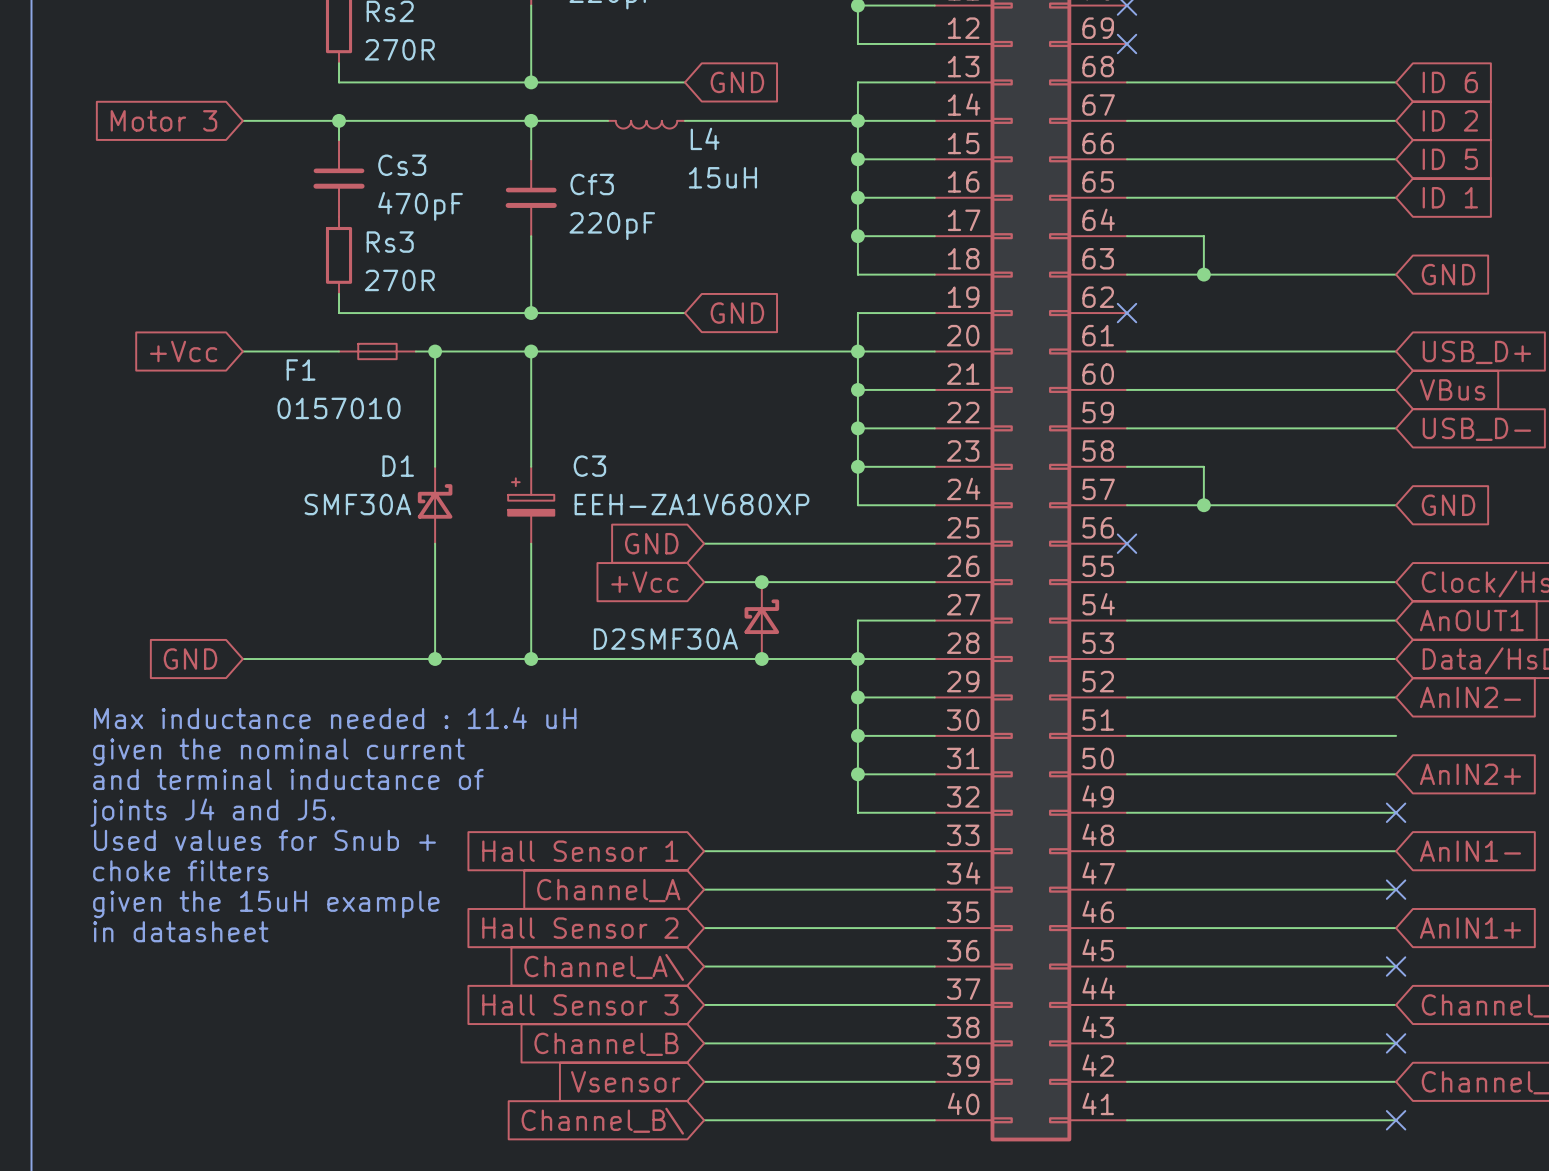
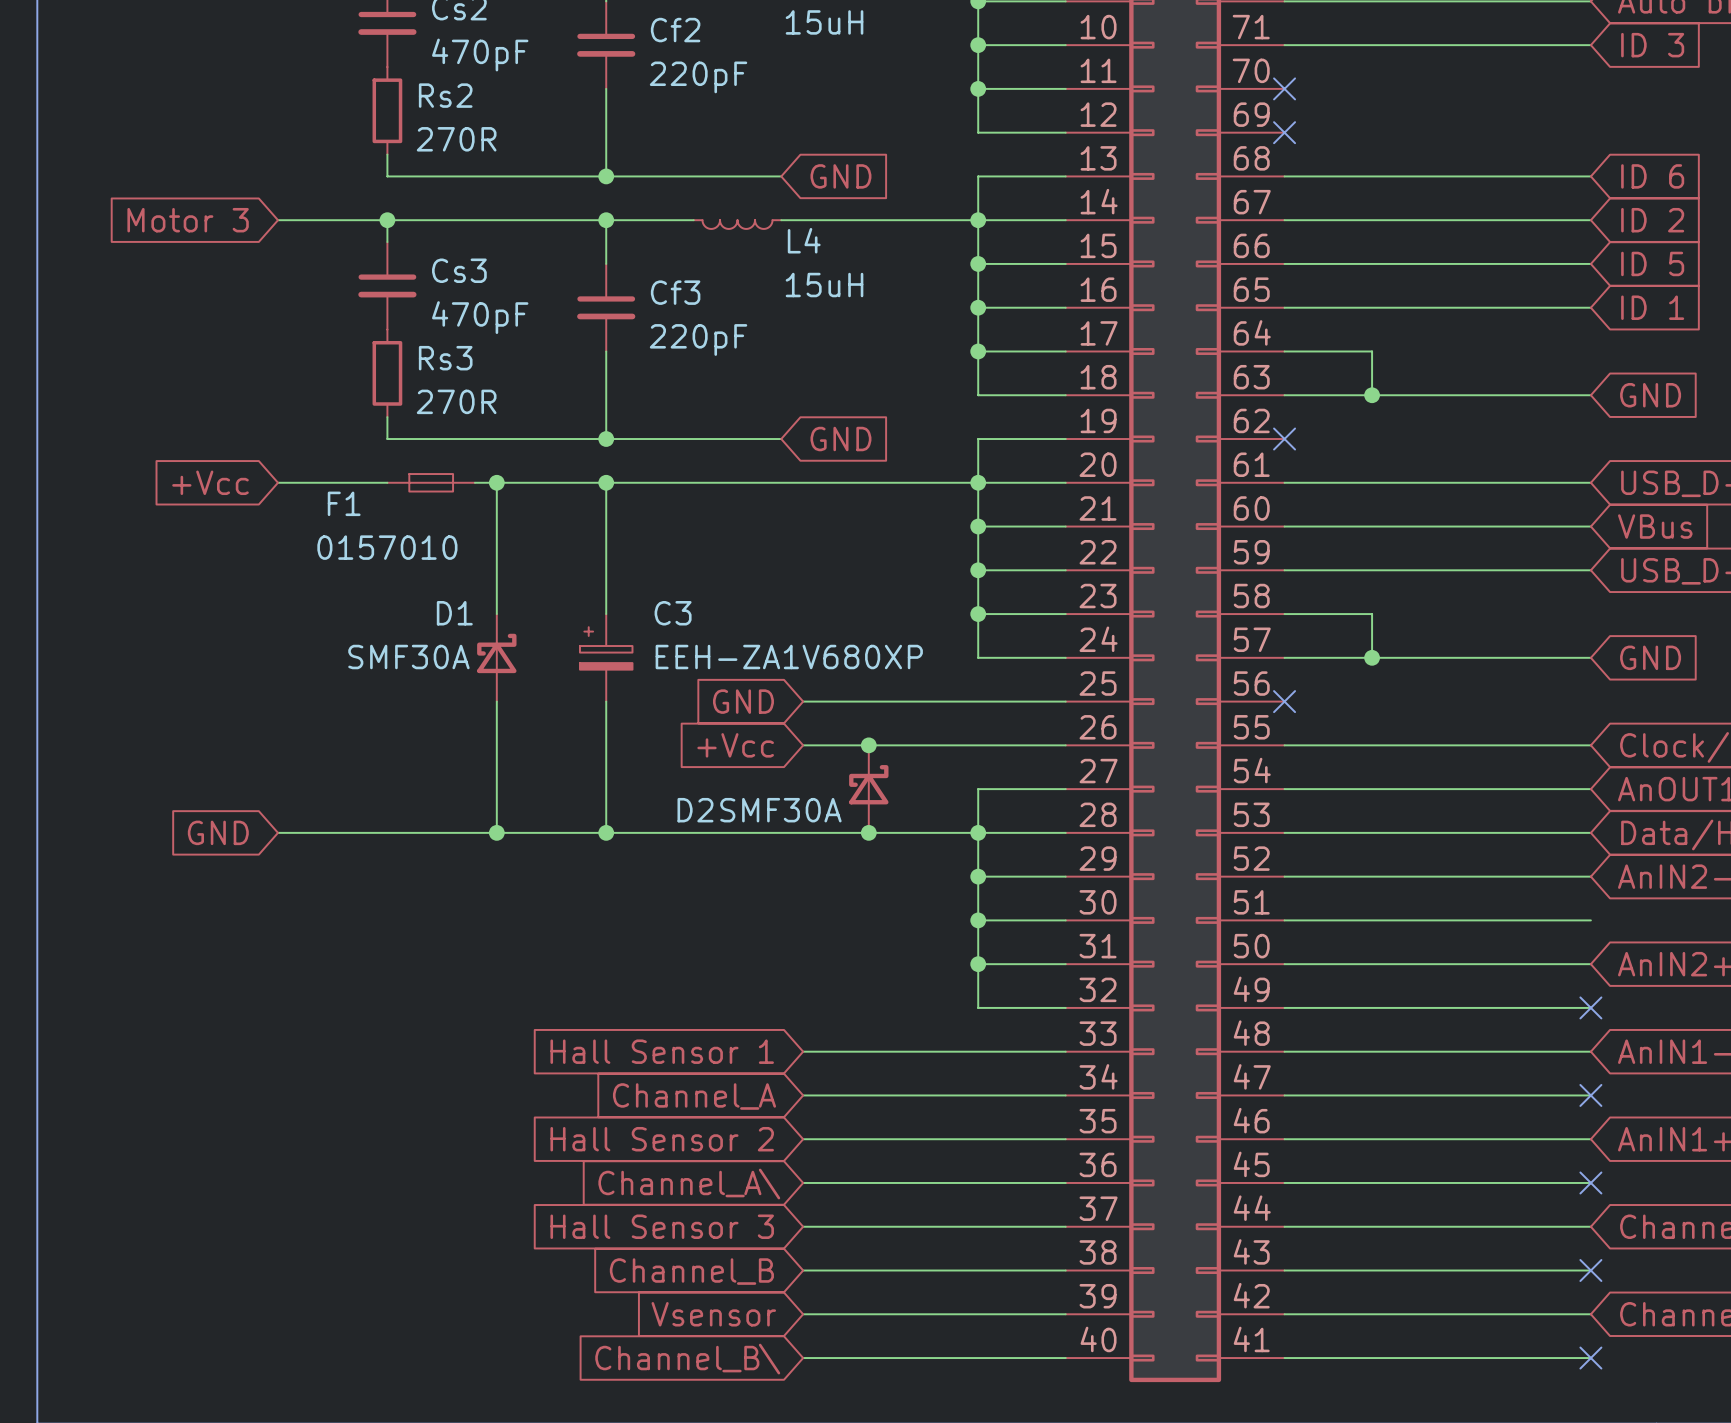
text: Max inductance needed : 11.4 uH (335, 718) -> none
text: given the nominal current (278, 752) -> none
text: and terminal inductance of (288, 779) -> none
text: joints J4 and J5. (212, 812) -> none
text: Used values for Snub + (264, 840) -> none
text: choke filters (180, 870) -> none
text: given the 15uH example (266, 904) -> none
text: in datasheet (180, 931) -> none

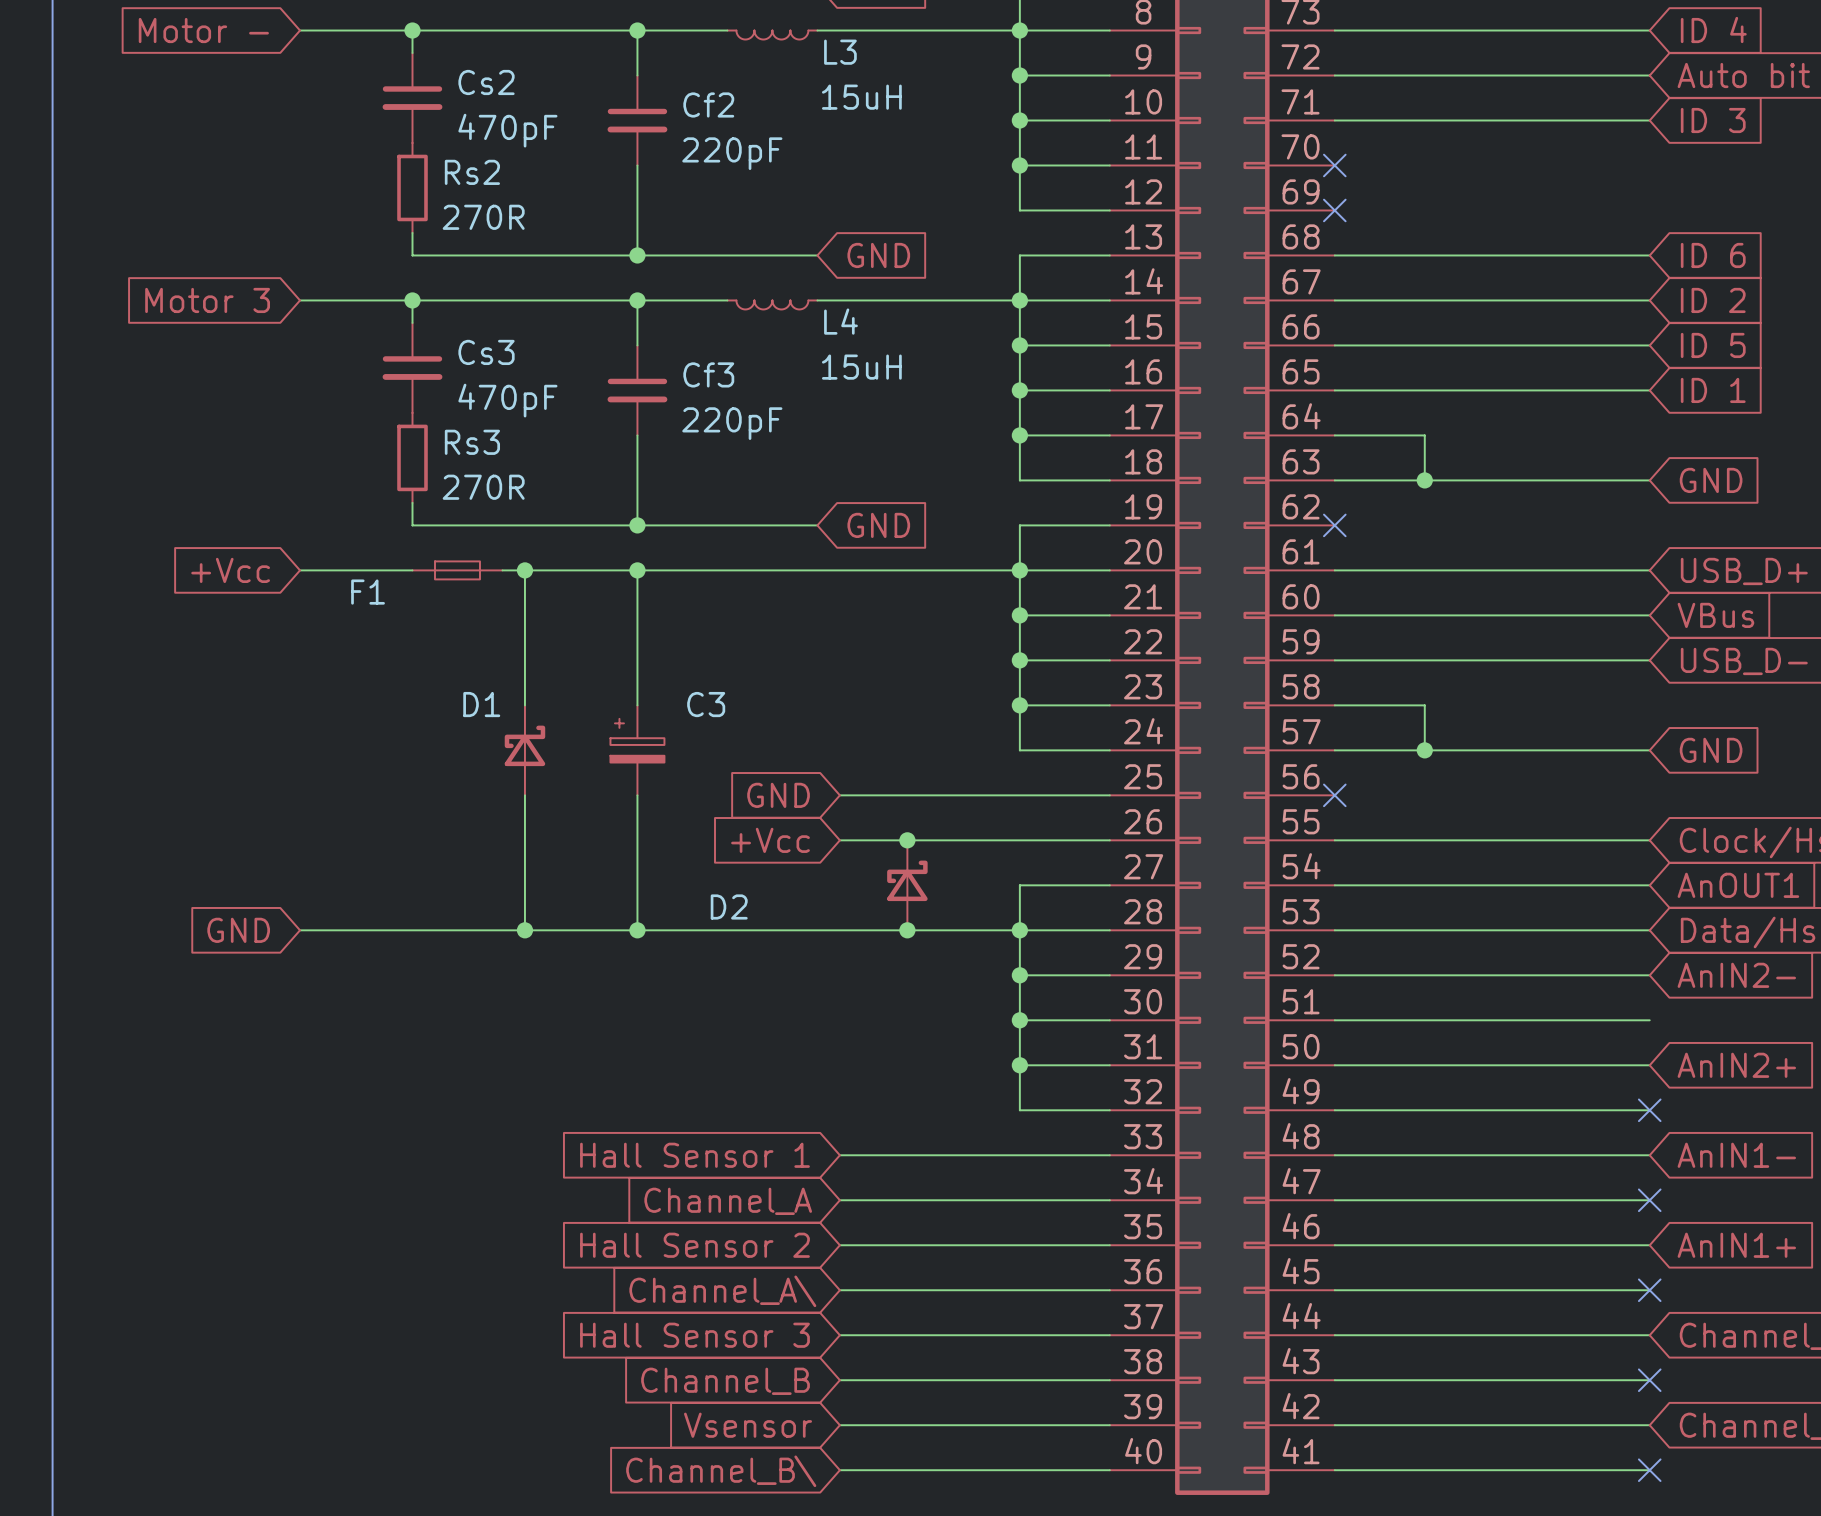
F1 value: 0157010 (387, 547) -> none
D1 value: SMF30A (408, 657) -> none
C3 value: EEH-ZA1V680XP (789, 657) -> none
D2 value: SMF30A (780, 810) -> none

